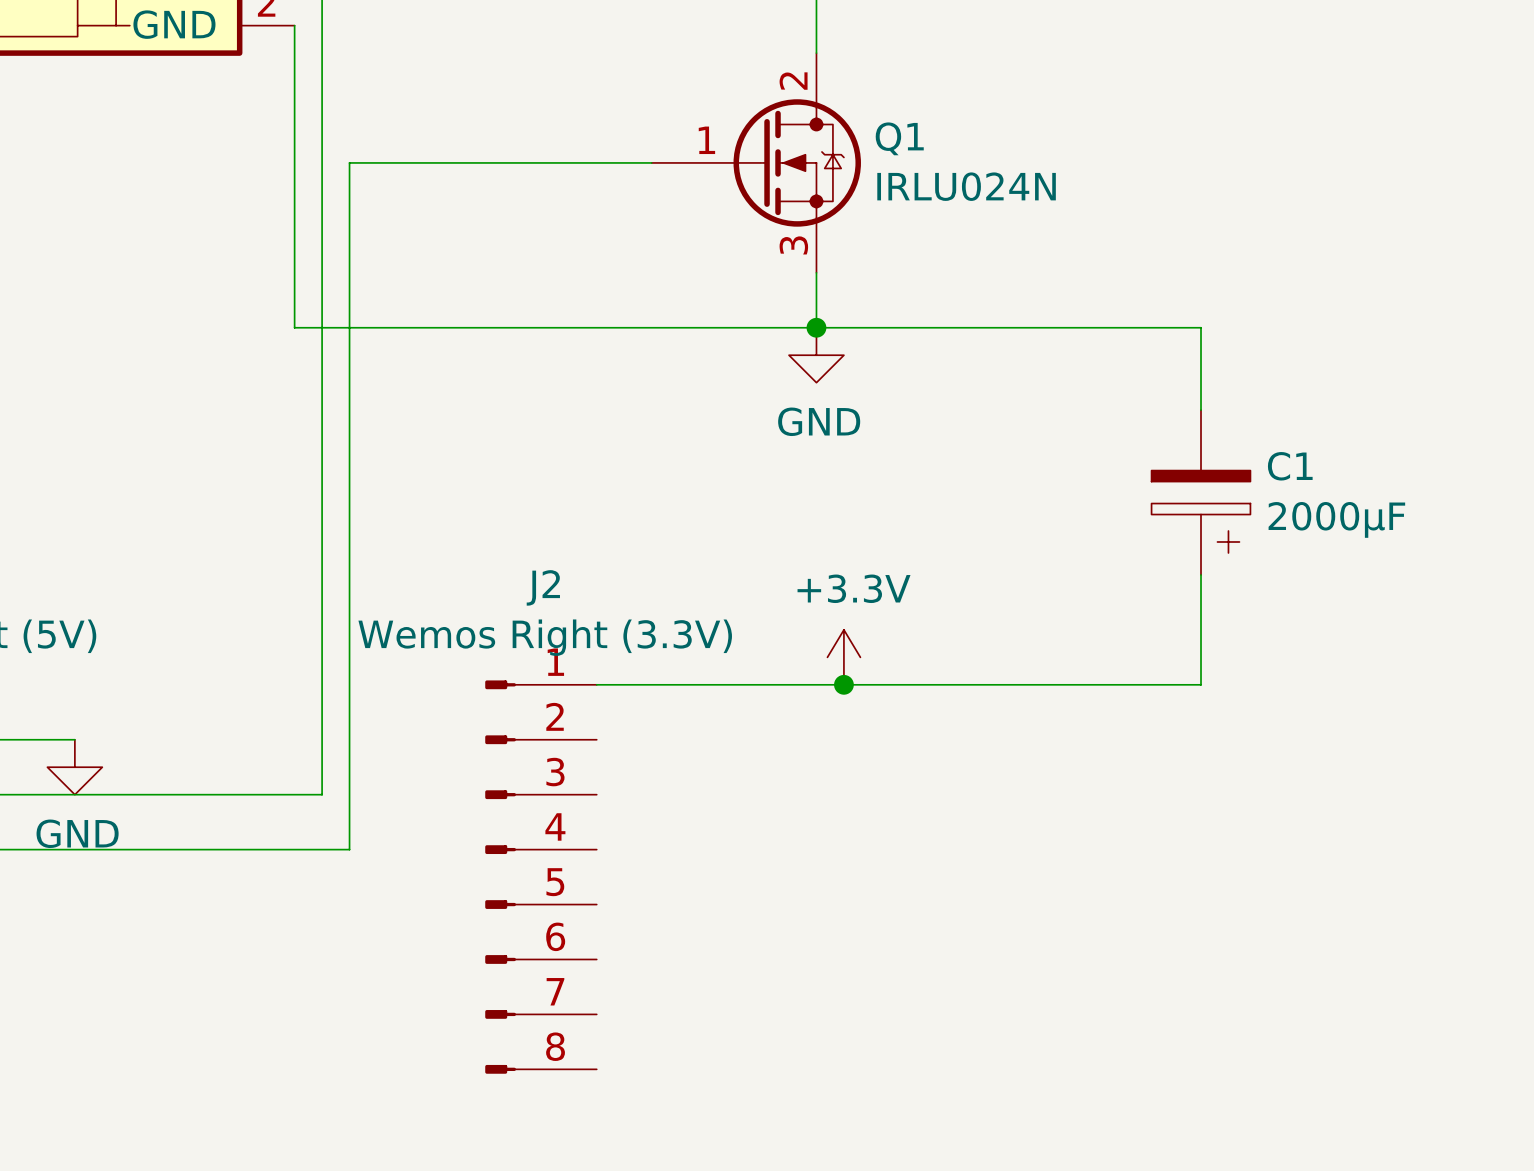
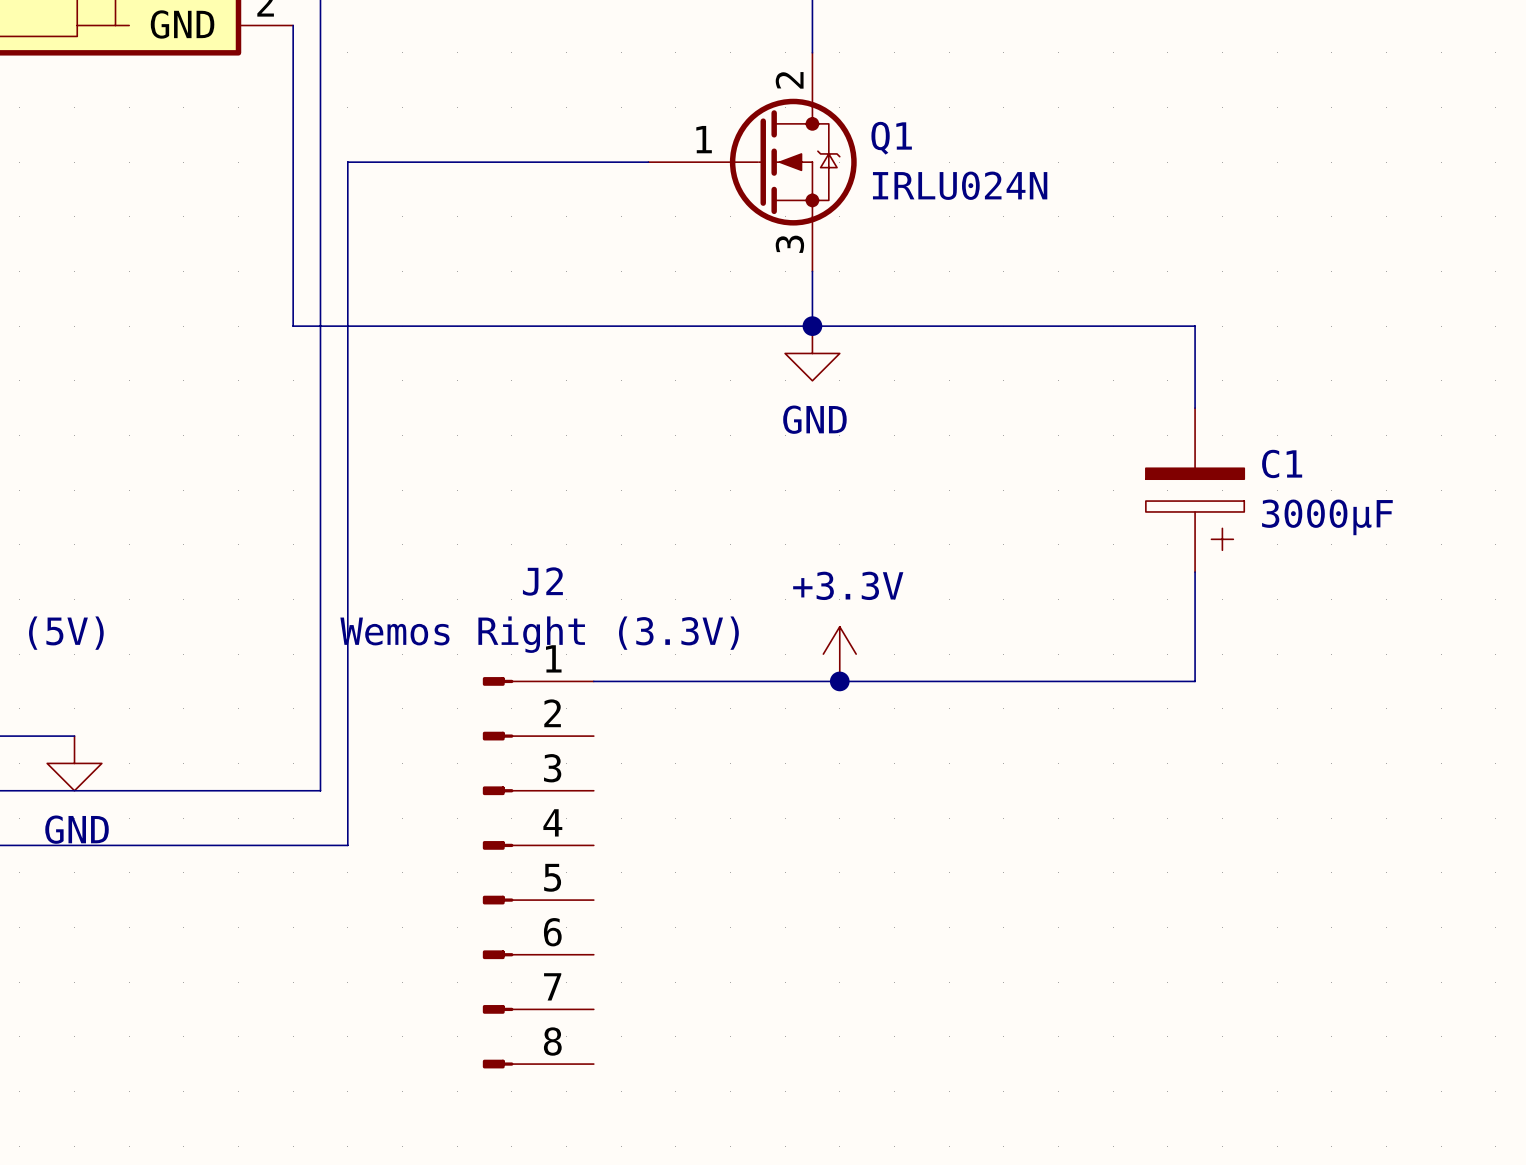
C1 value: 2000µF (1336, 519) -> 3000µF (1327, 517)

